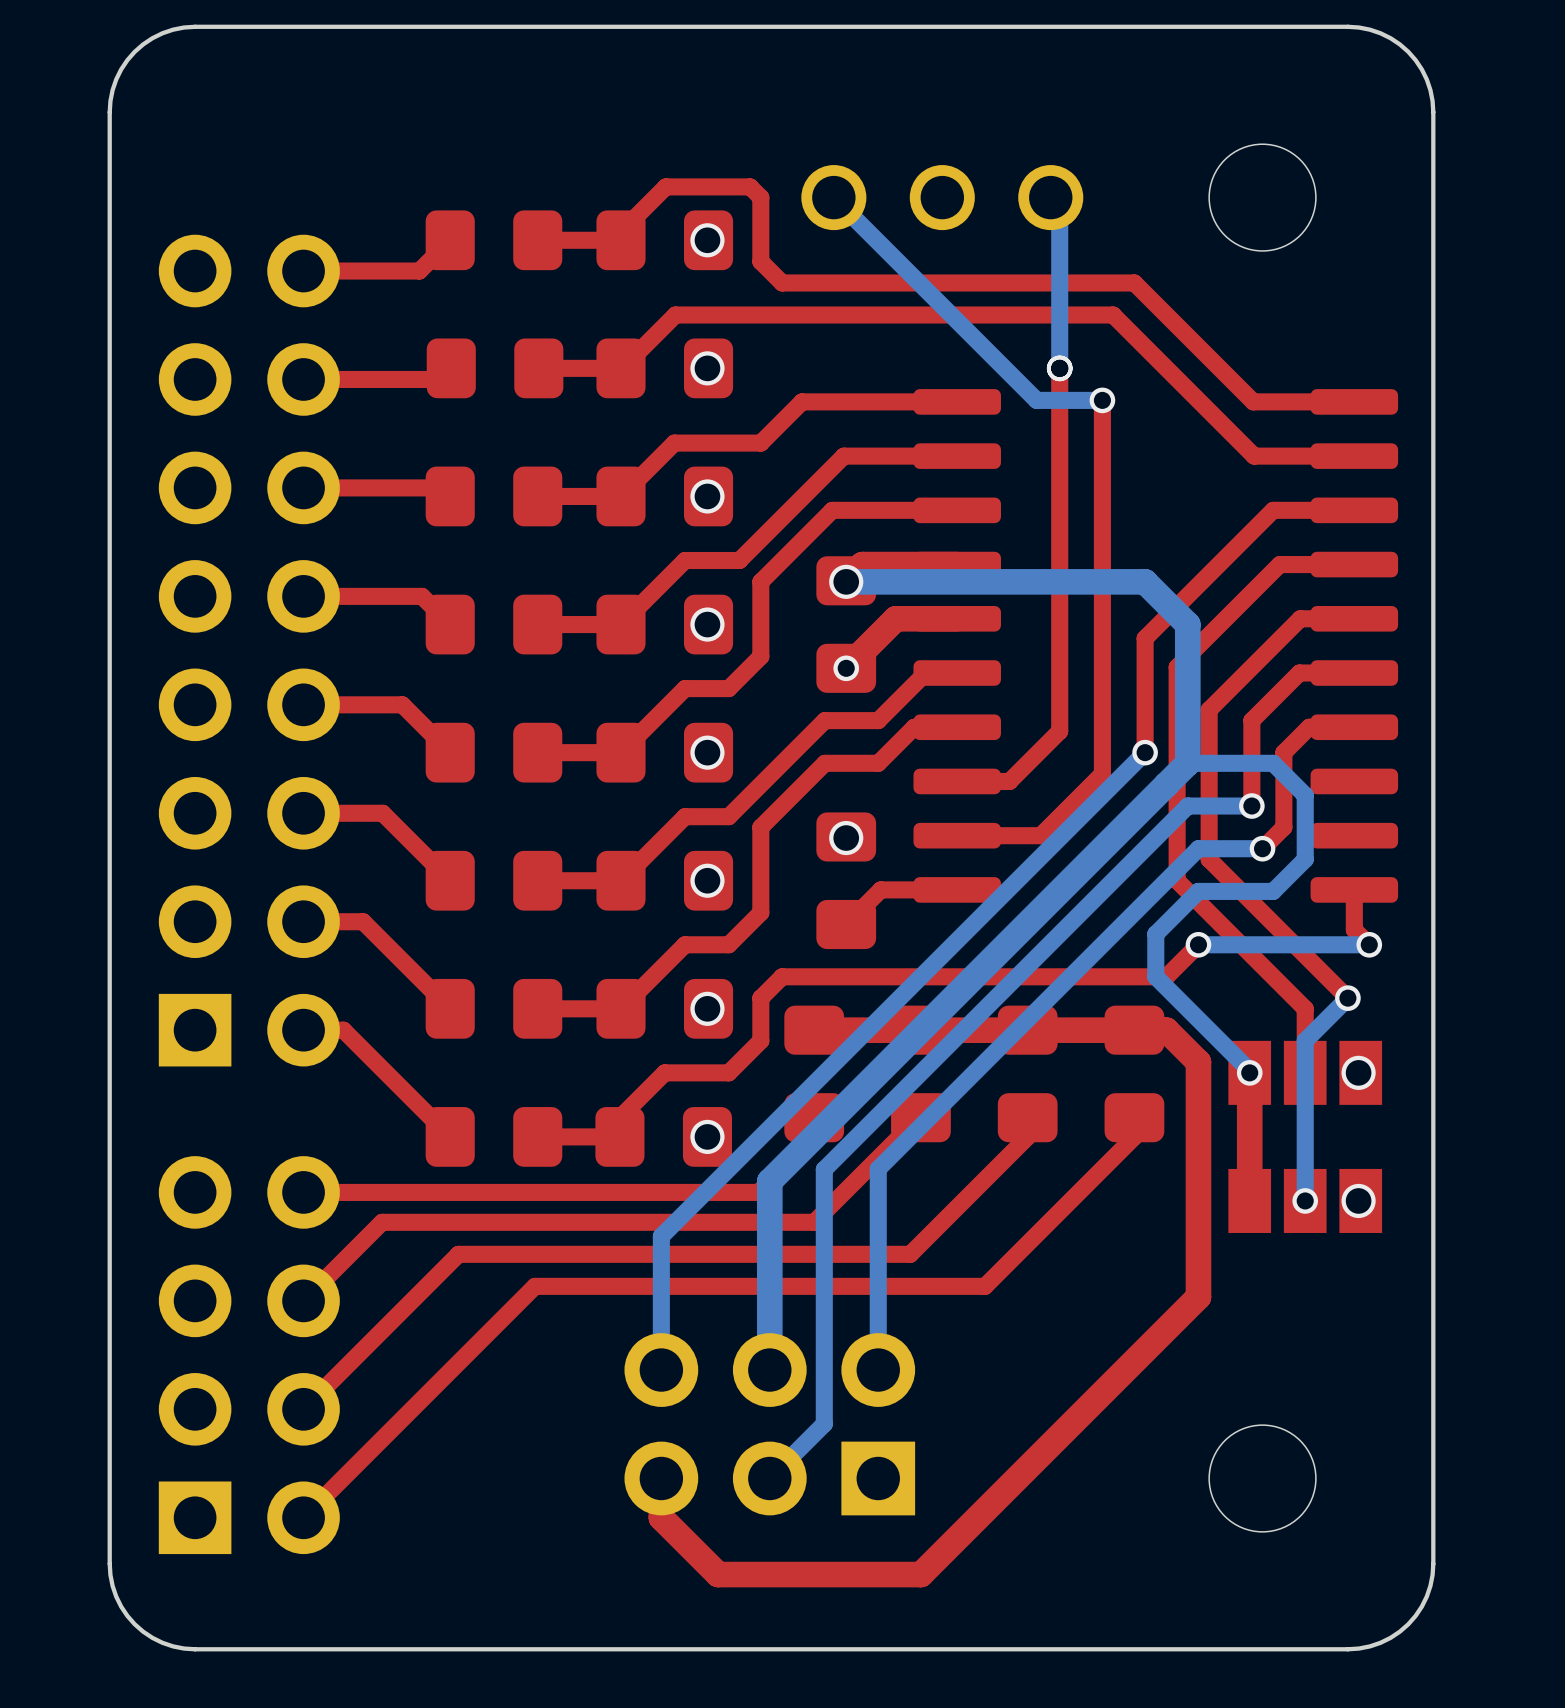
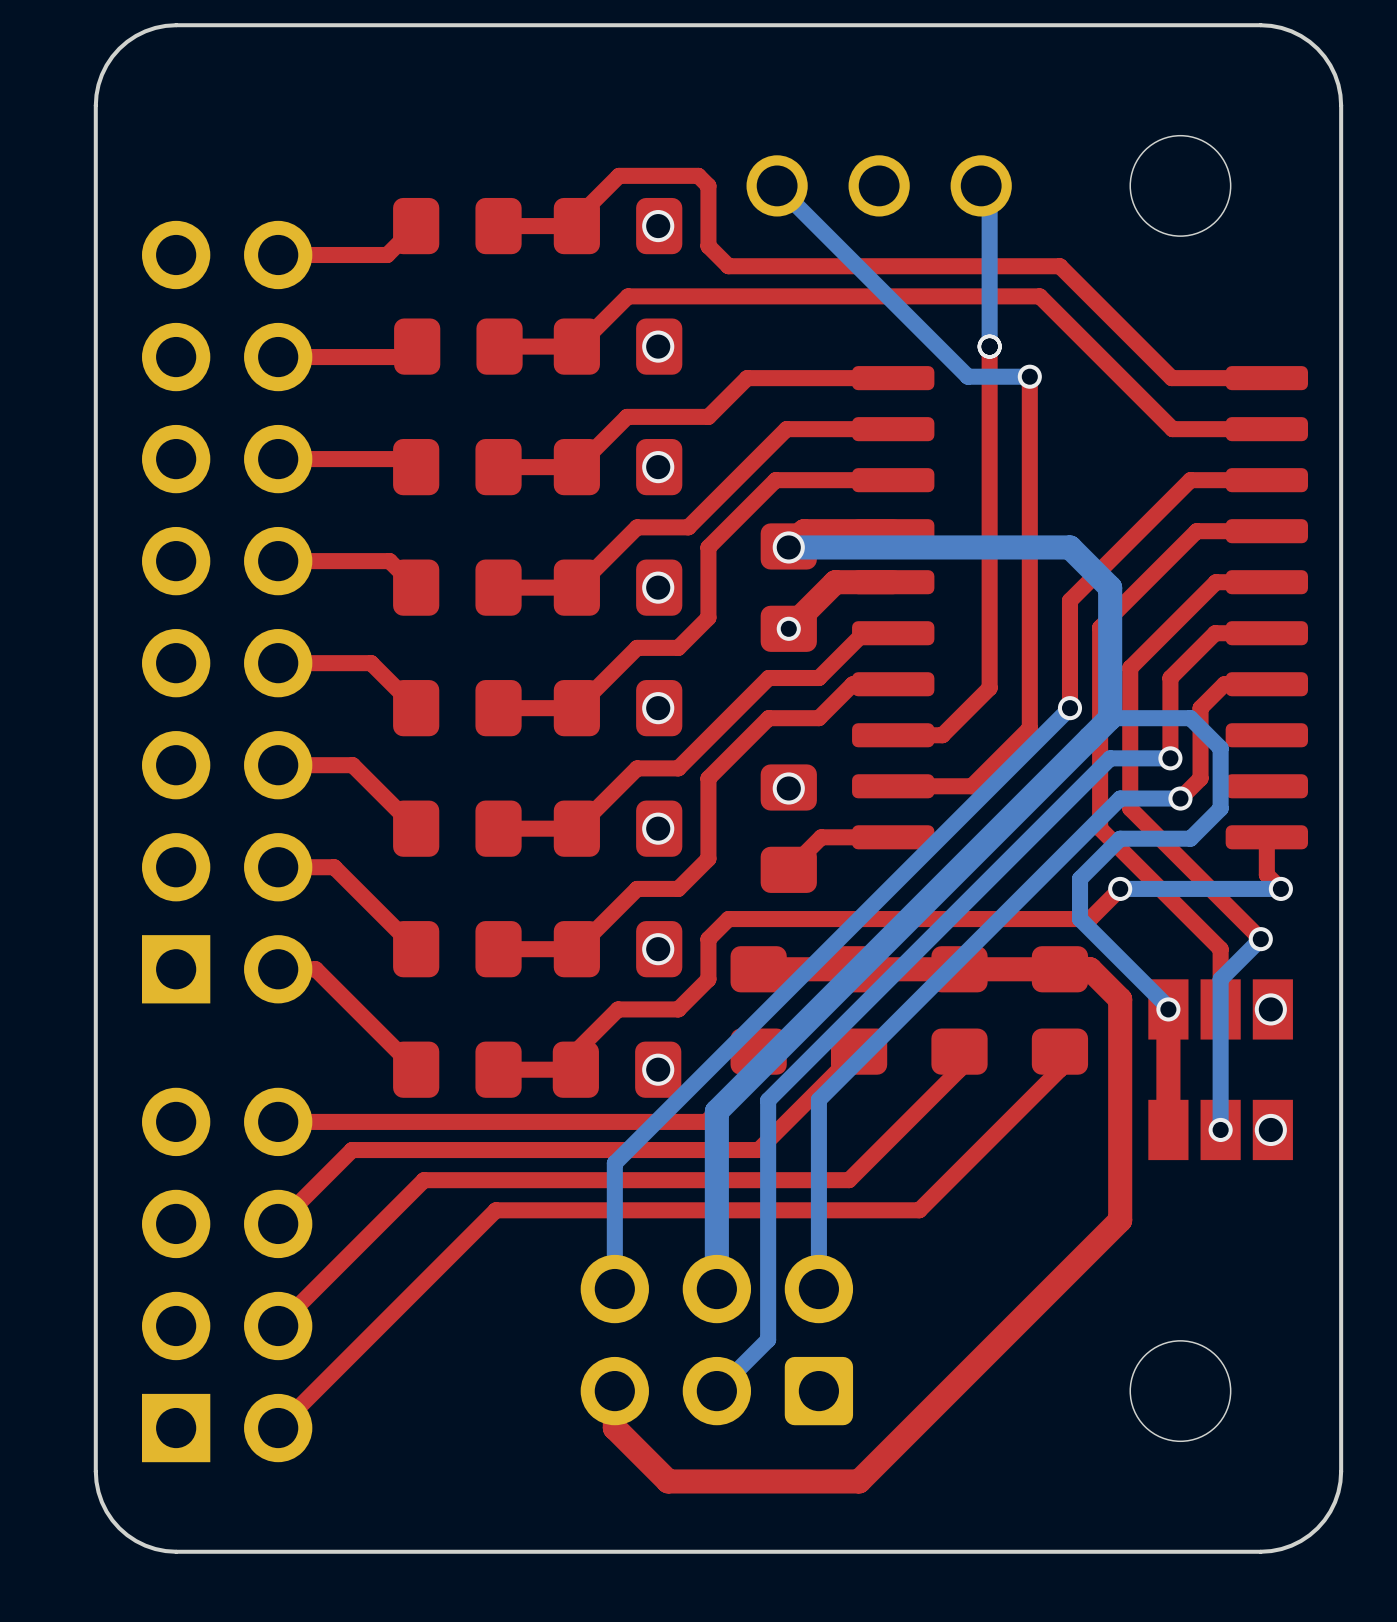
part footprint: [624, 1333, 916, 1516] -> [580, 1254, 854, 1426]

